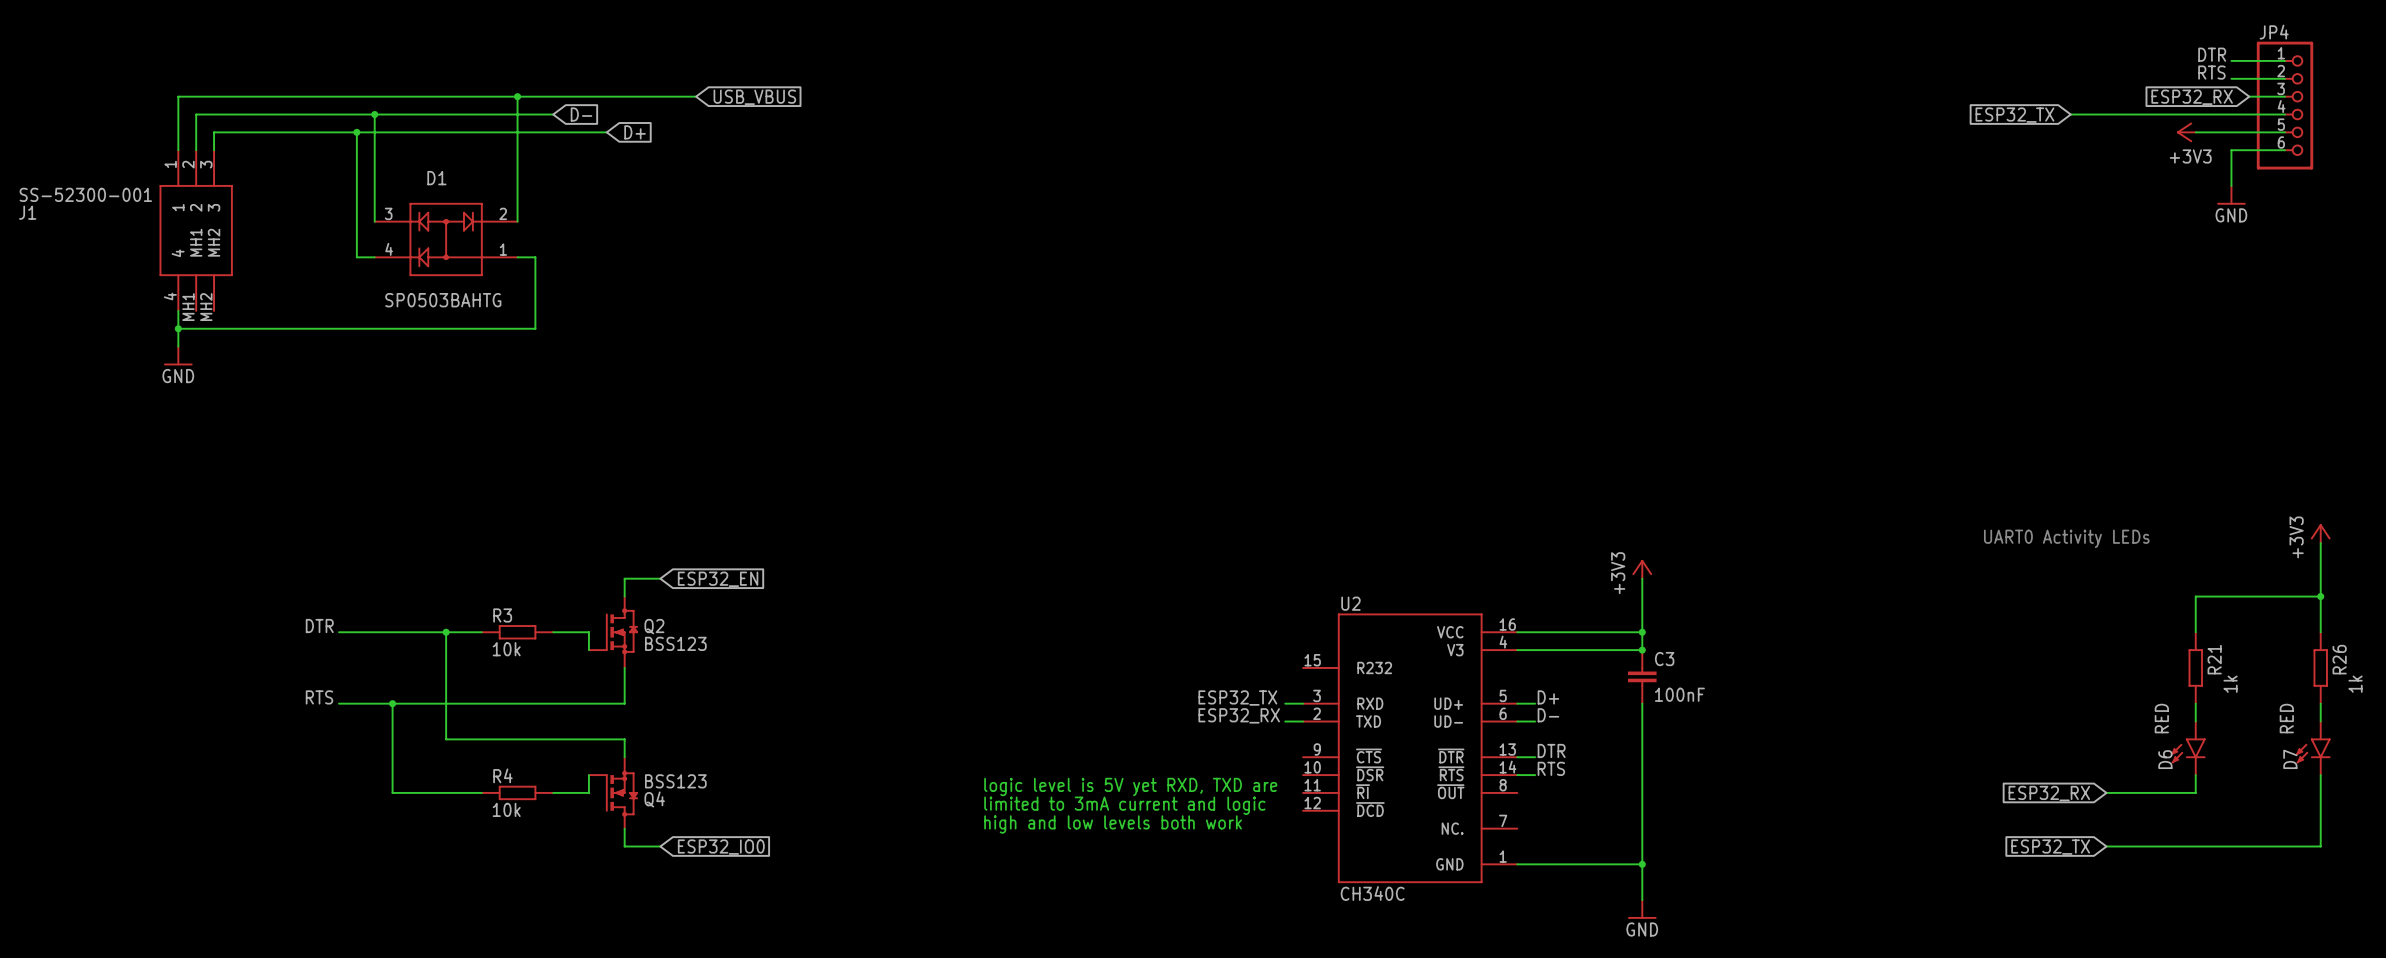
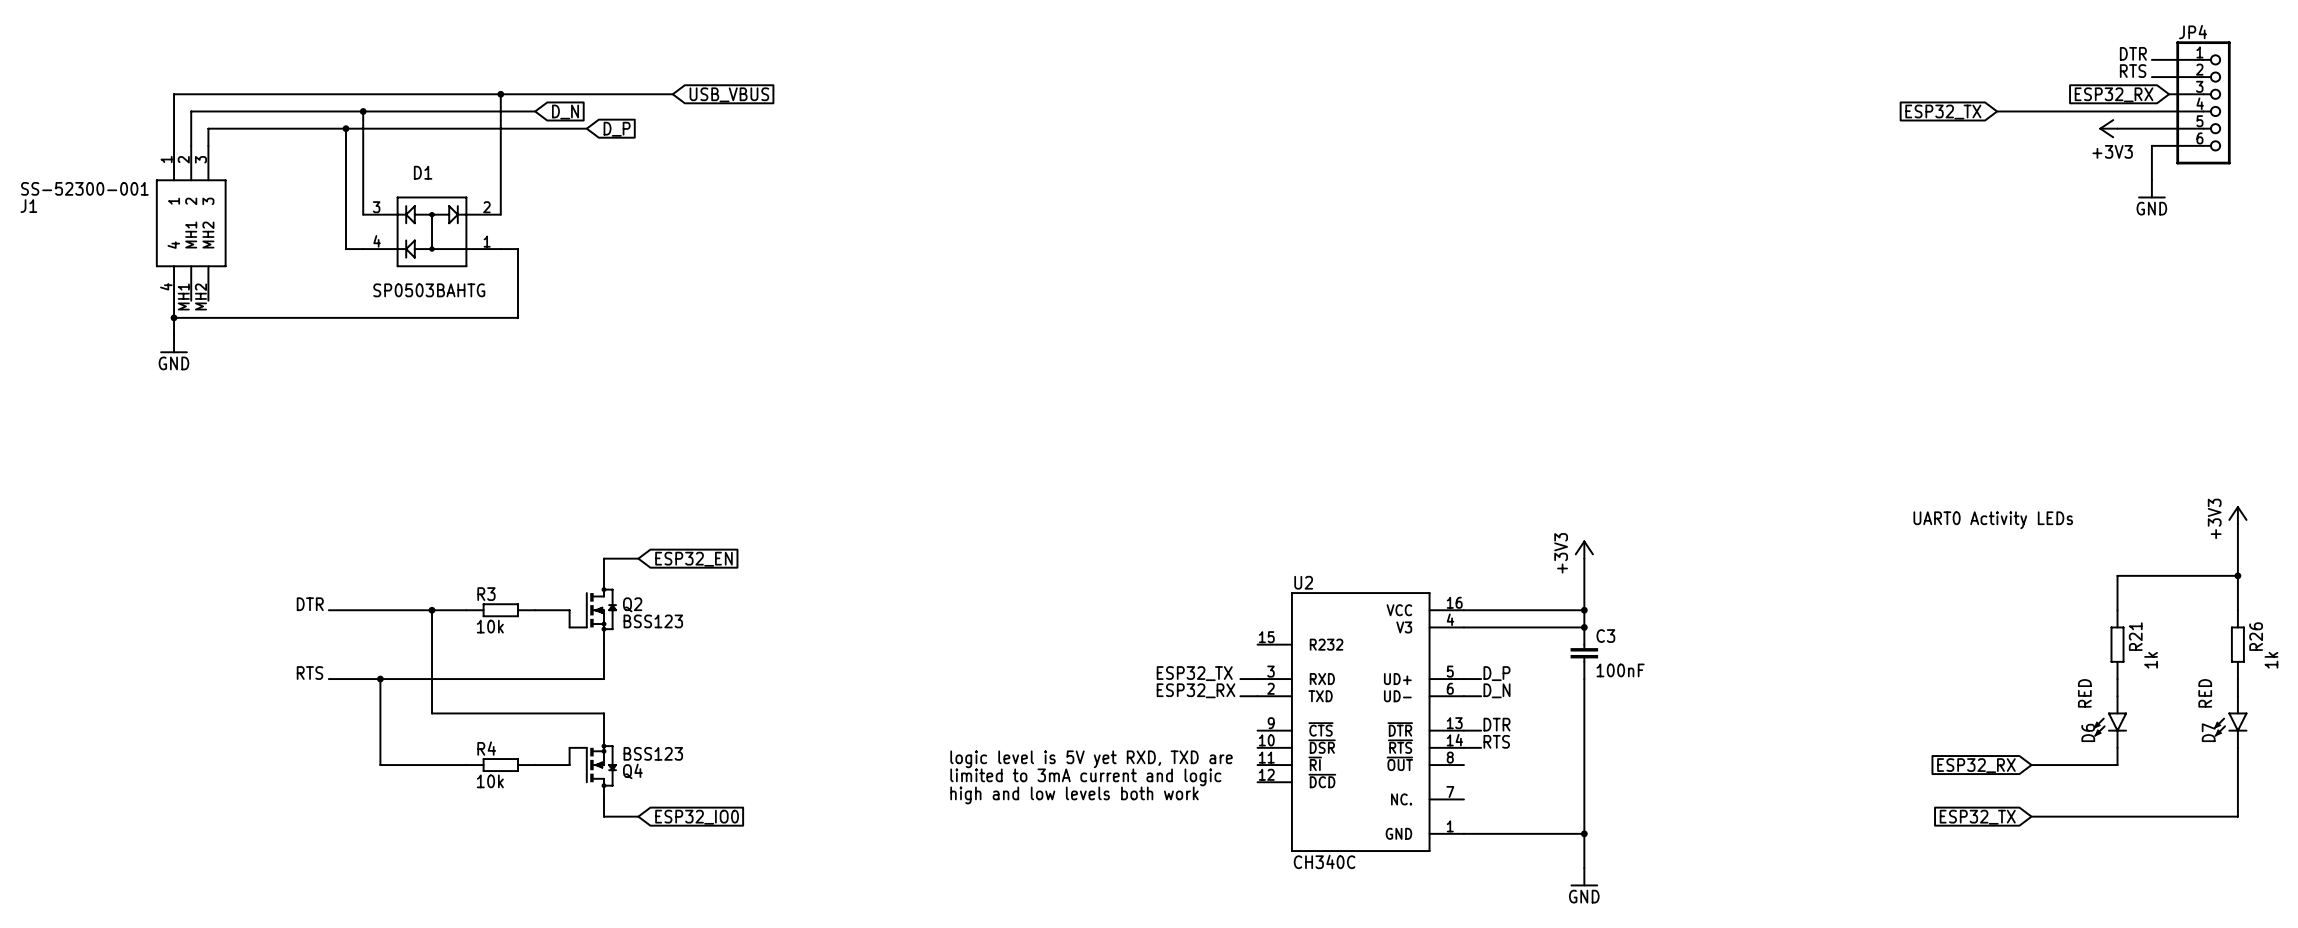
global label: D- (581, 114) -> D_N (565, 112)
global label: D+ (635, 132) -> D_P (617, 129)
label: D+ (1548, 697) -> D_P (1497, 673)
label: D- (1548, 715) -> D_N (1497, 690)

